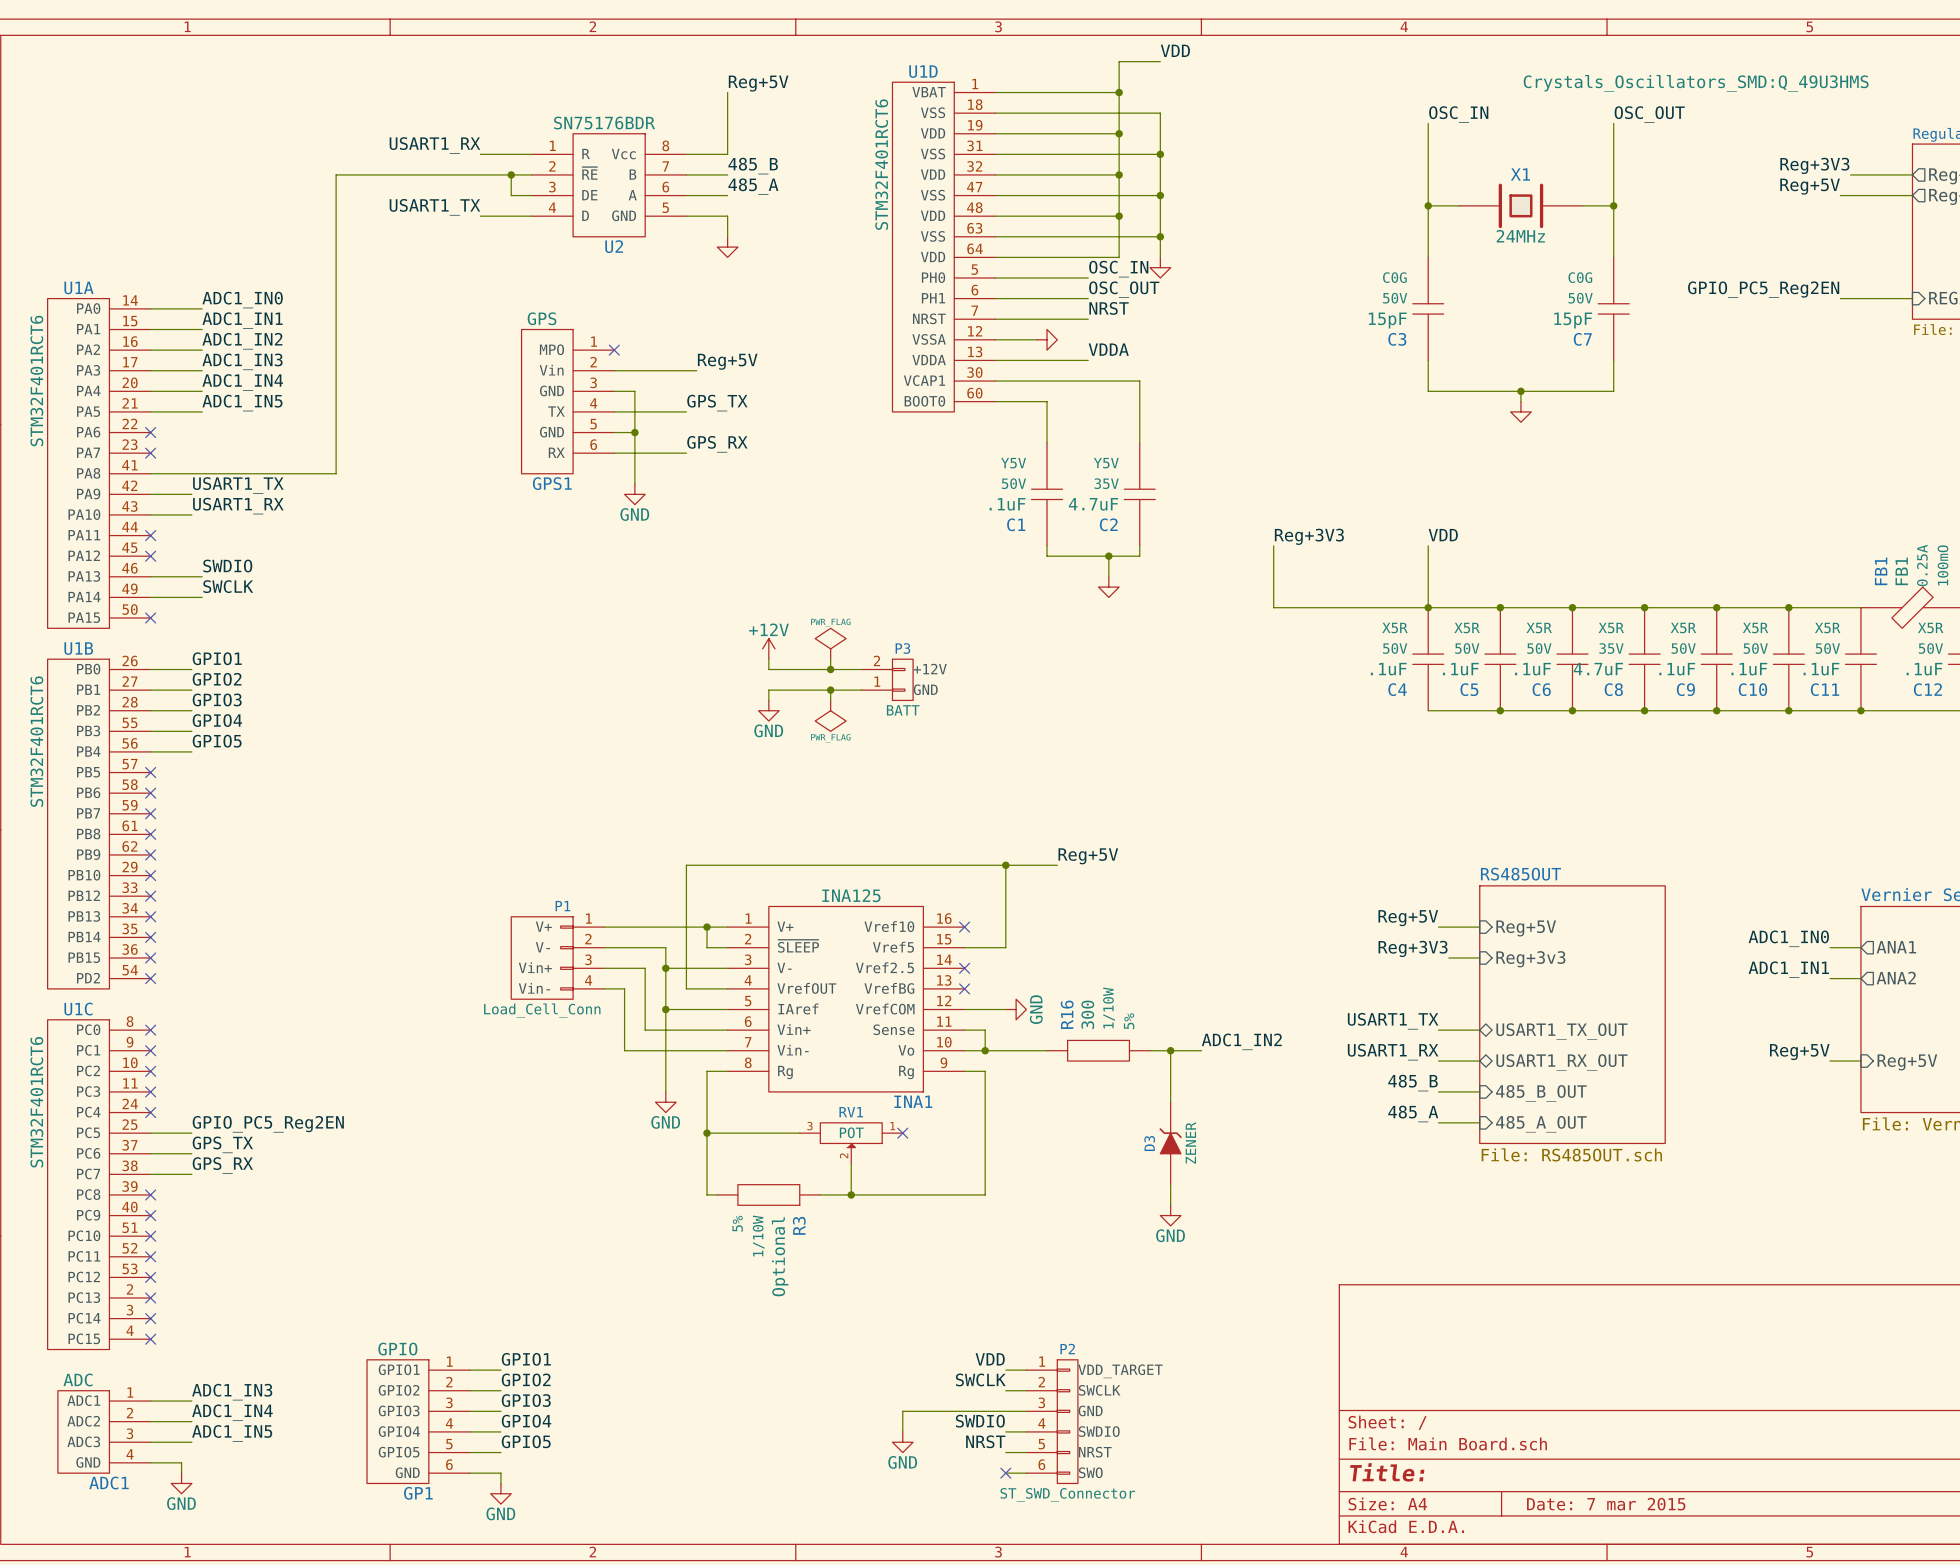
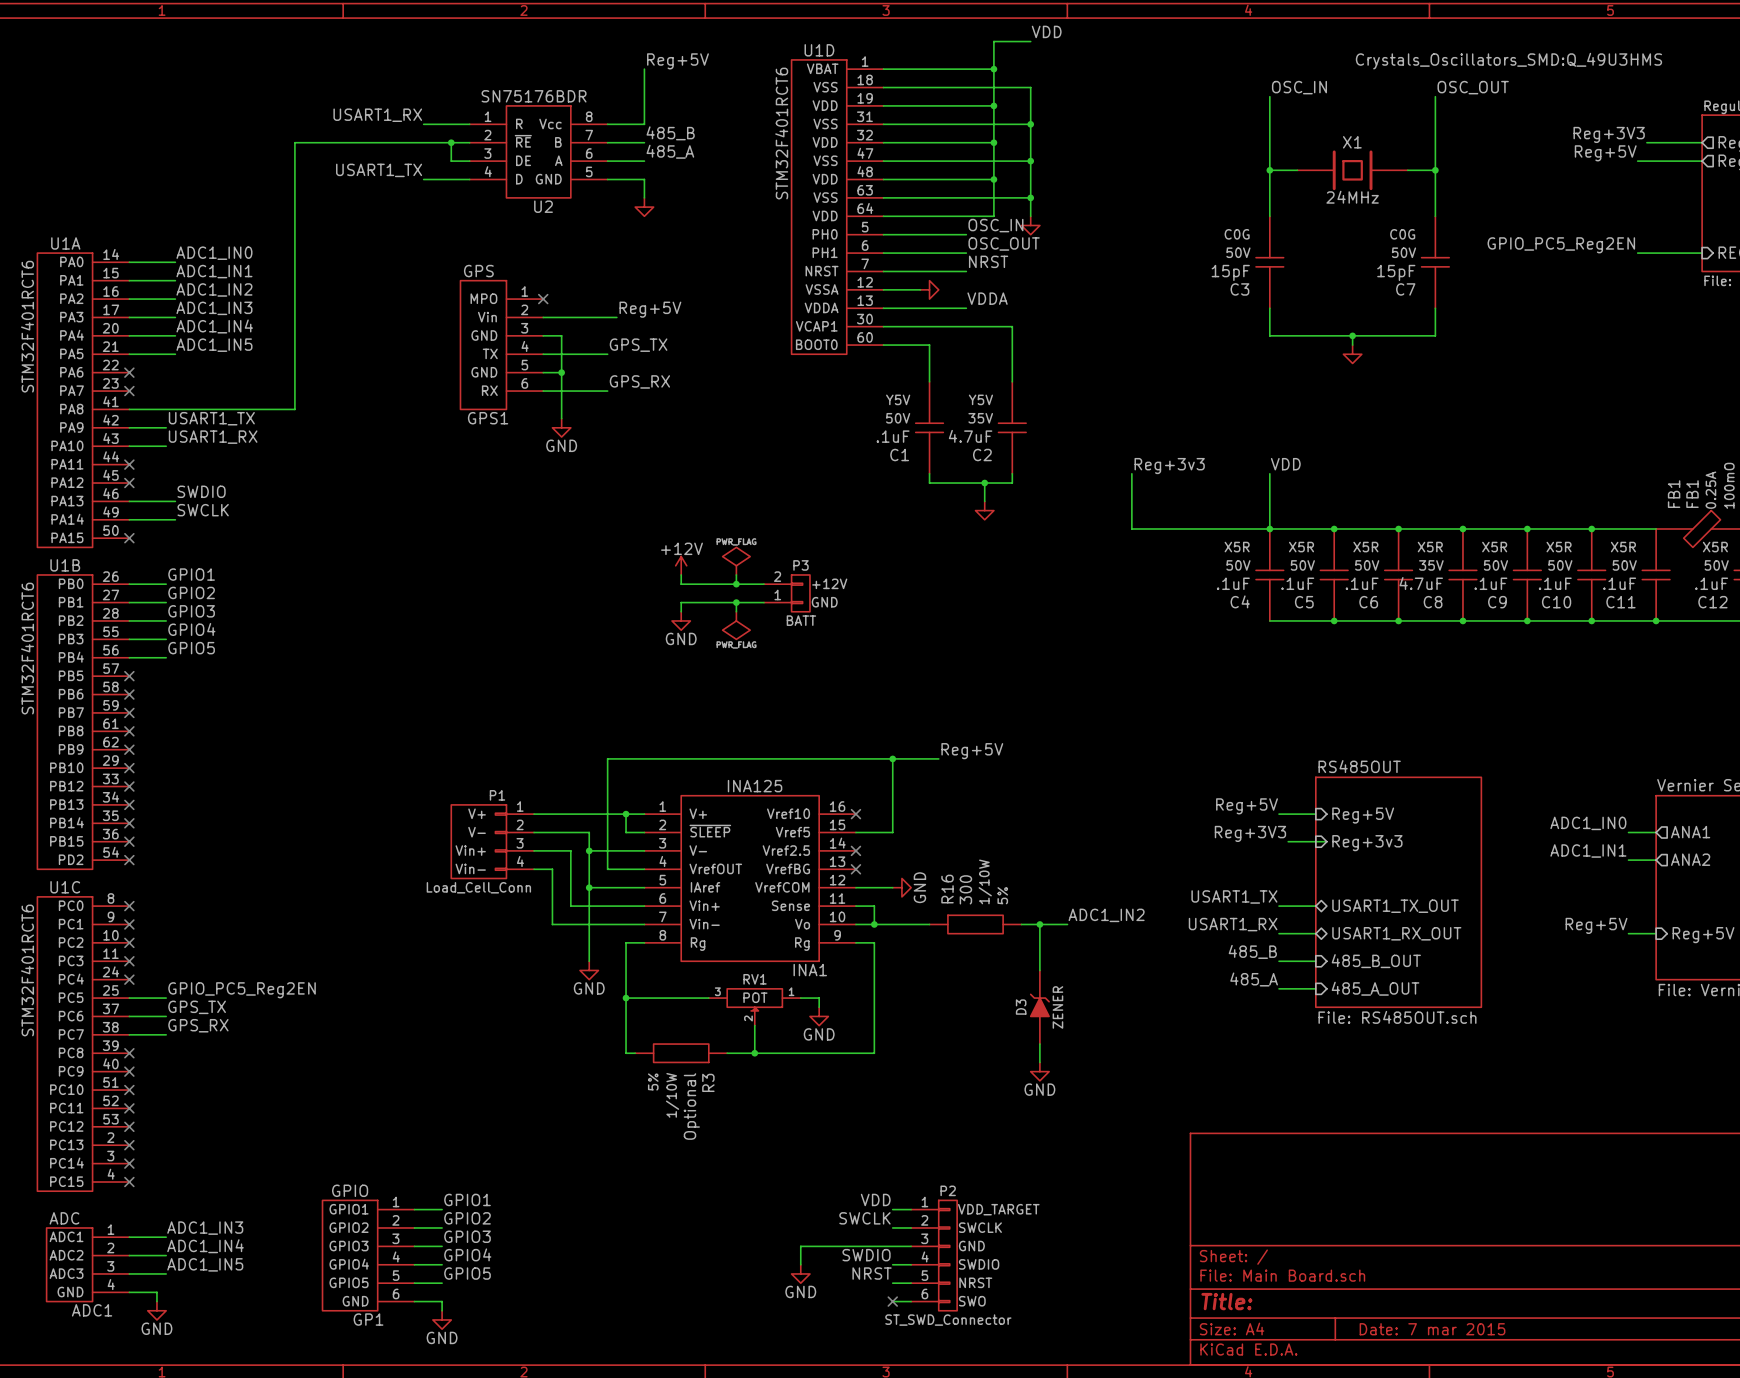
label: Reg+3V3 (1309, 536) -> Reg+3v3 (1169, 466)
wire: none -> (1315, 841) (1325, 841)
wire: none -> (800, 998) (819, 998) (819, 1007)
no-connect mark: (902, 1133) -> none
power symbol: none -> GND (819, 1016)

